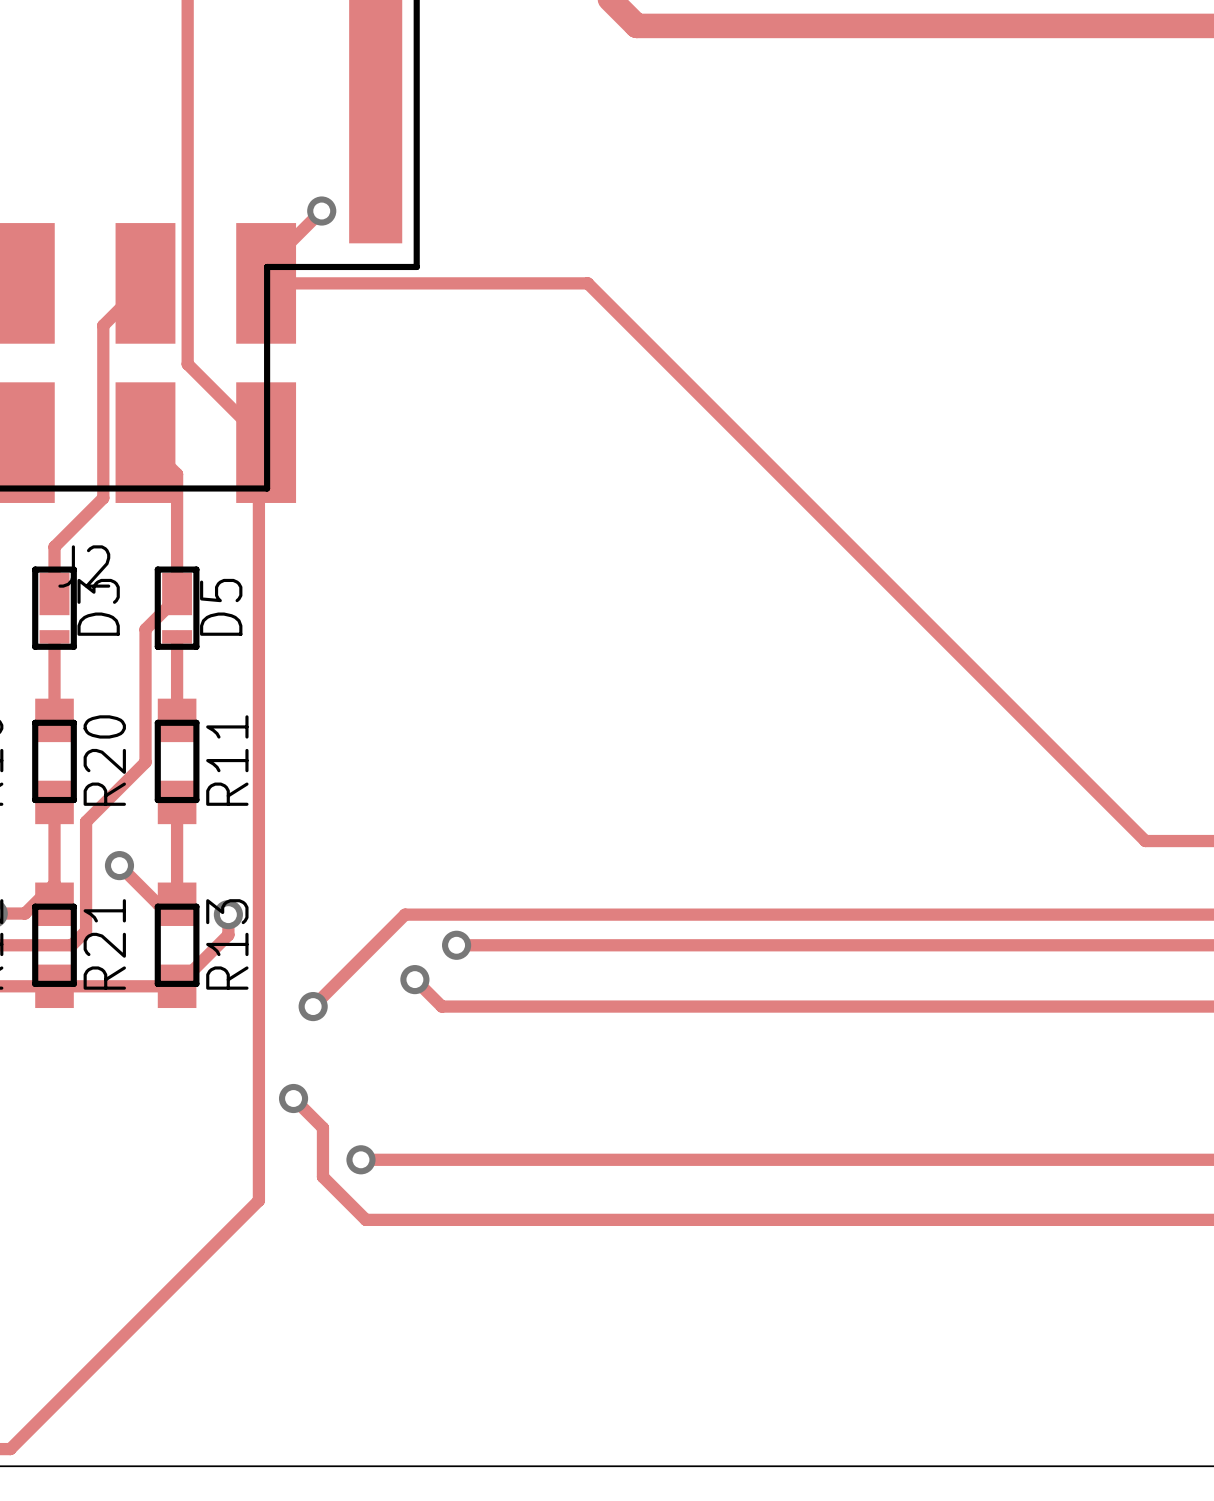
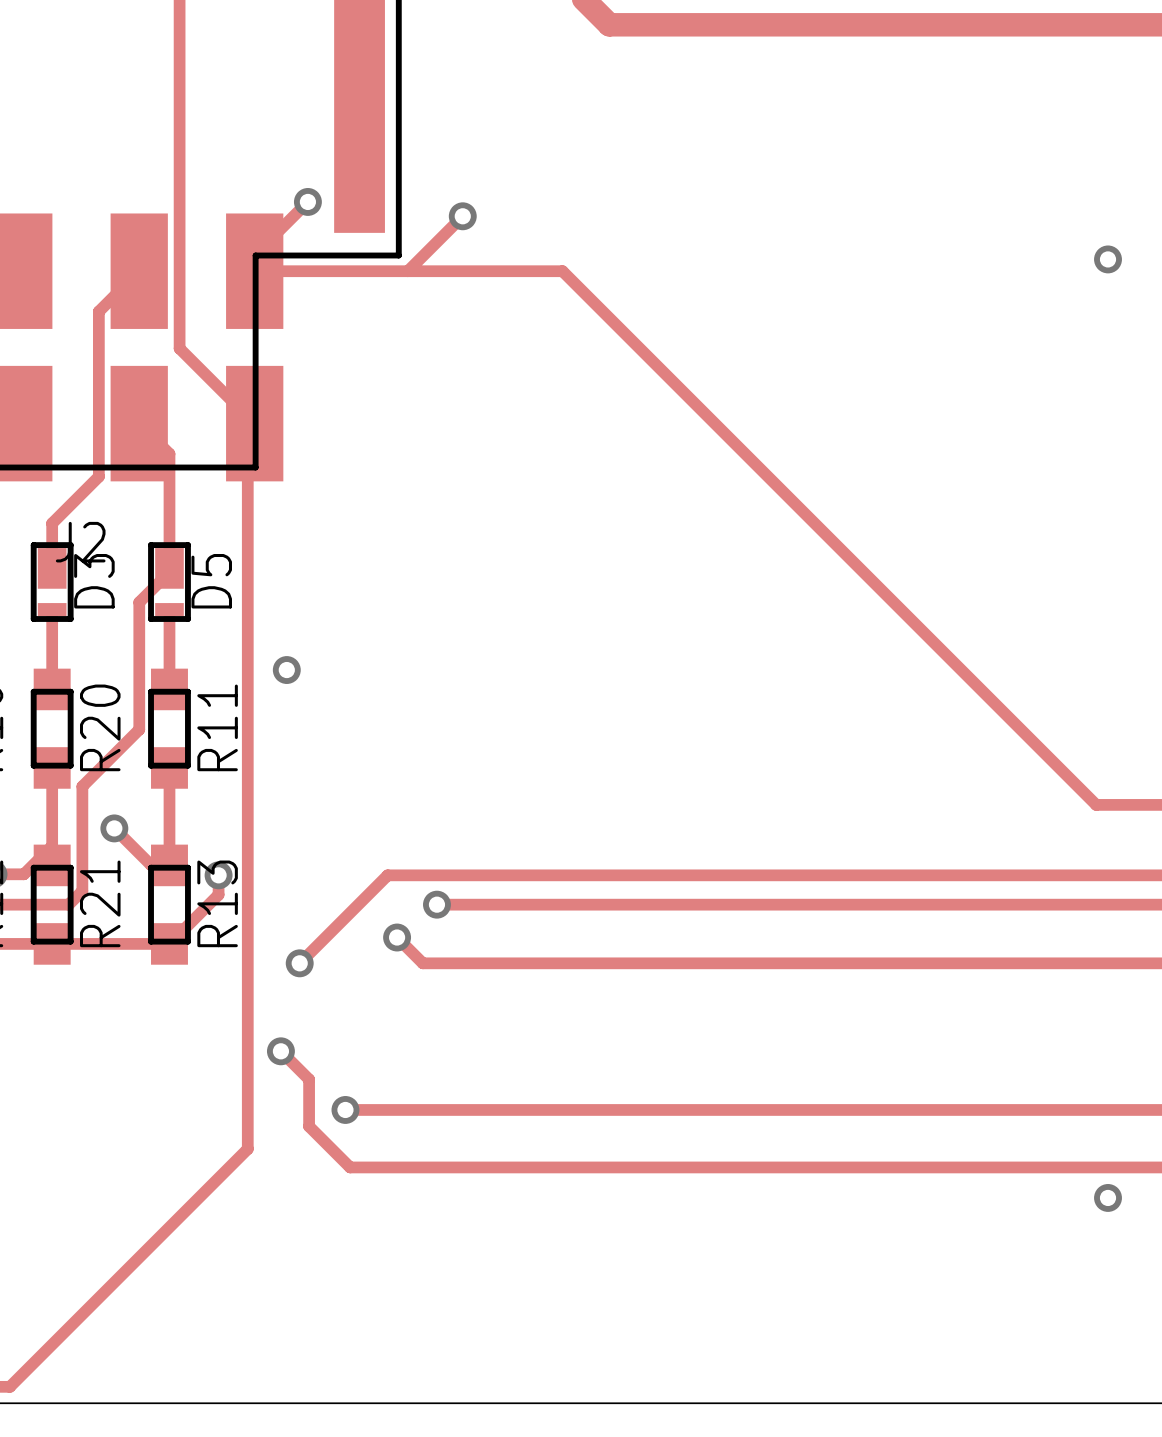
track: none -> (462, 216) (407, 271)
via: none -> (462, 216)
via: none -> (1108, 259)
via: none -> (286, 670)
via: none -> (1108, 1197)

